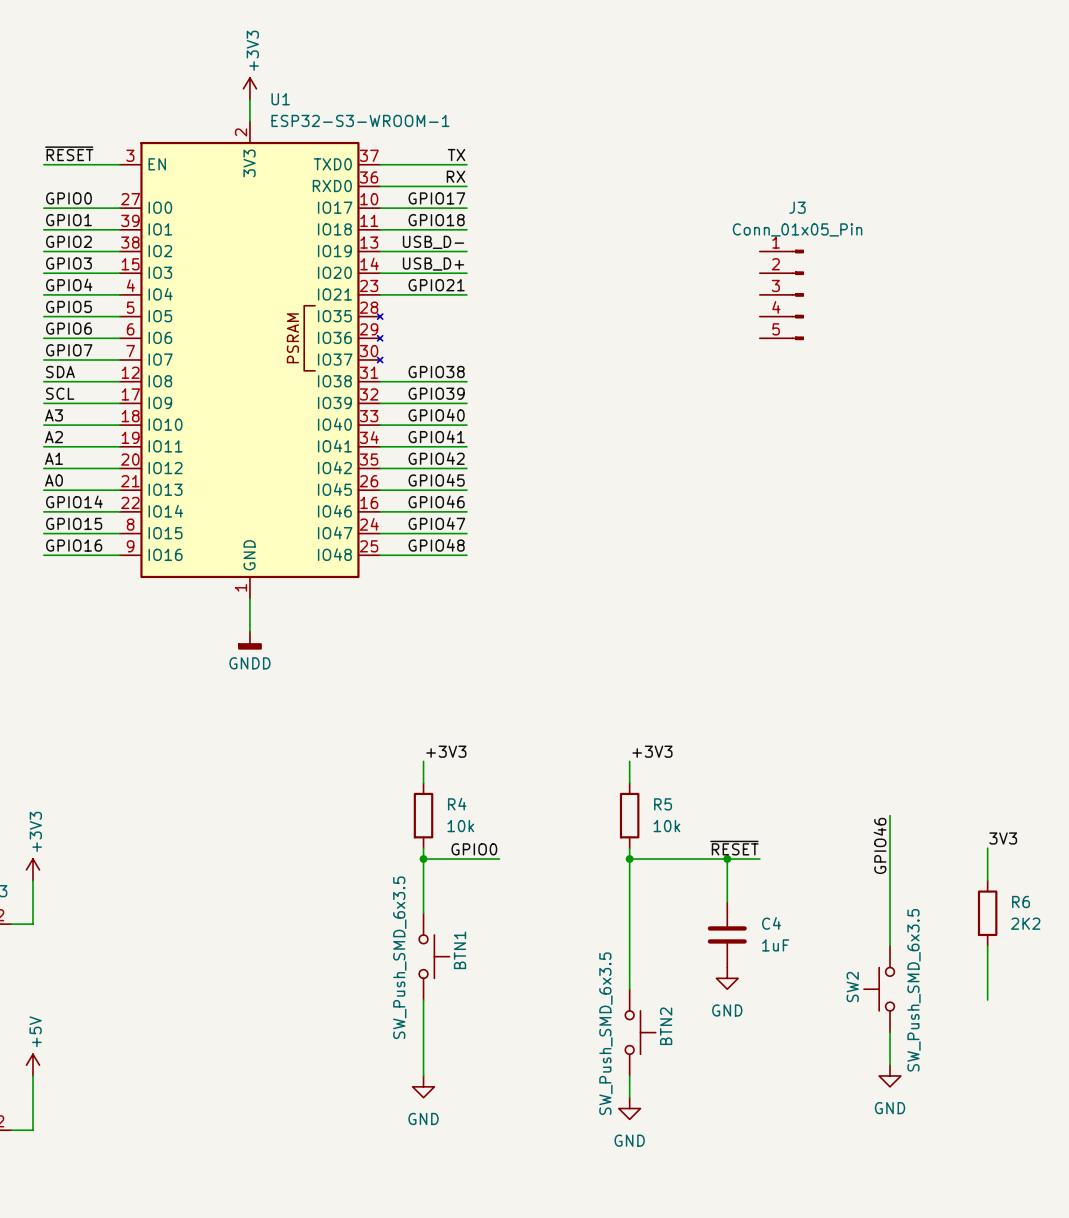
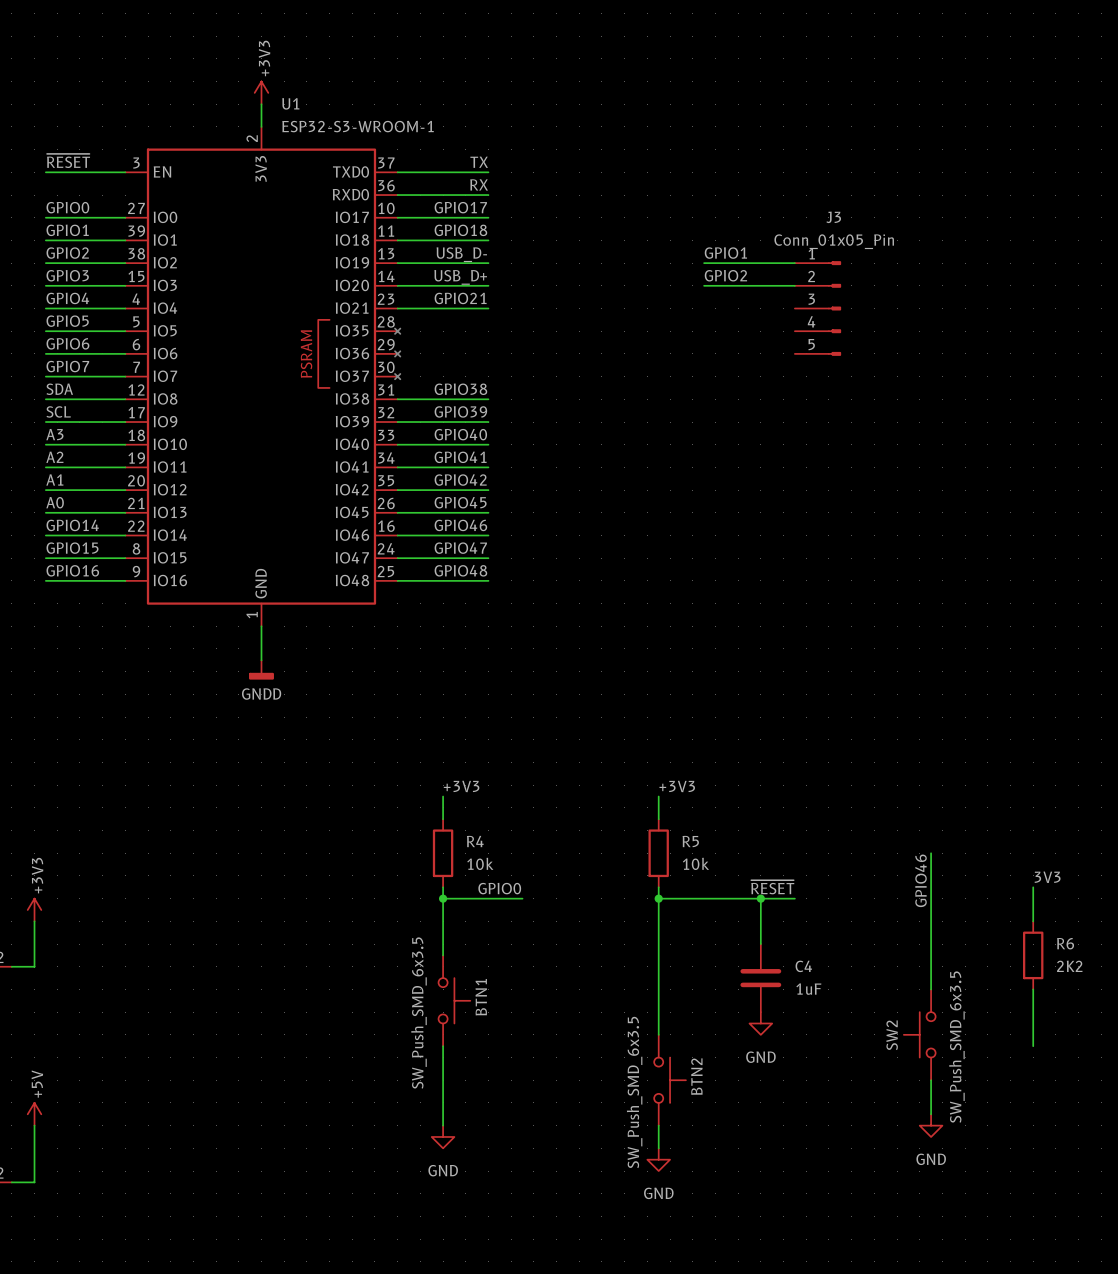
label: none -> GPIO1 (725, 253)
wire: none -> (704, 263) (794, 263)
label: none -> GPIO2 (725, 275)
wire: none -> (704, 285) (794, 285)

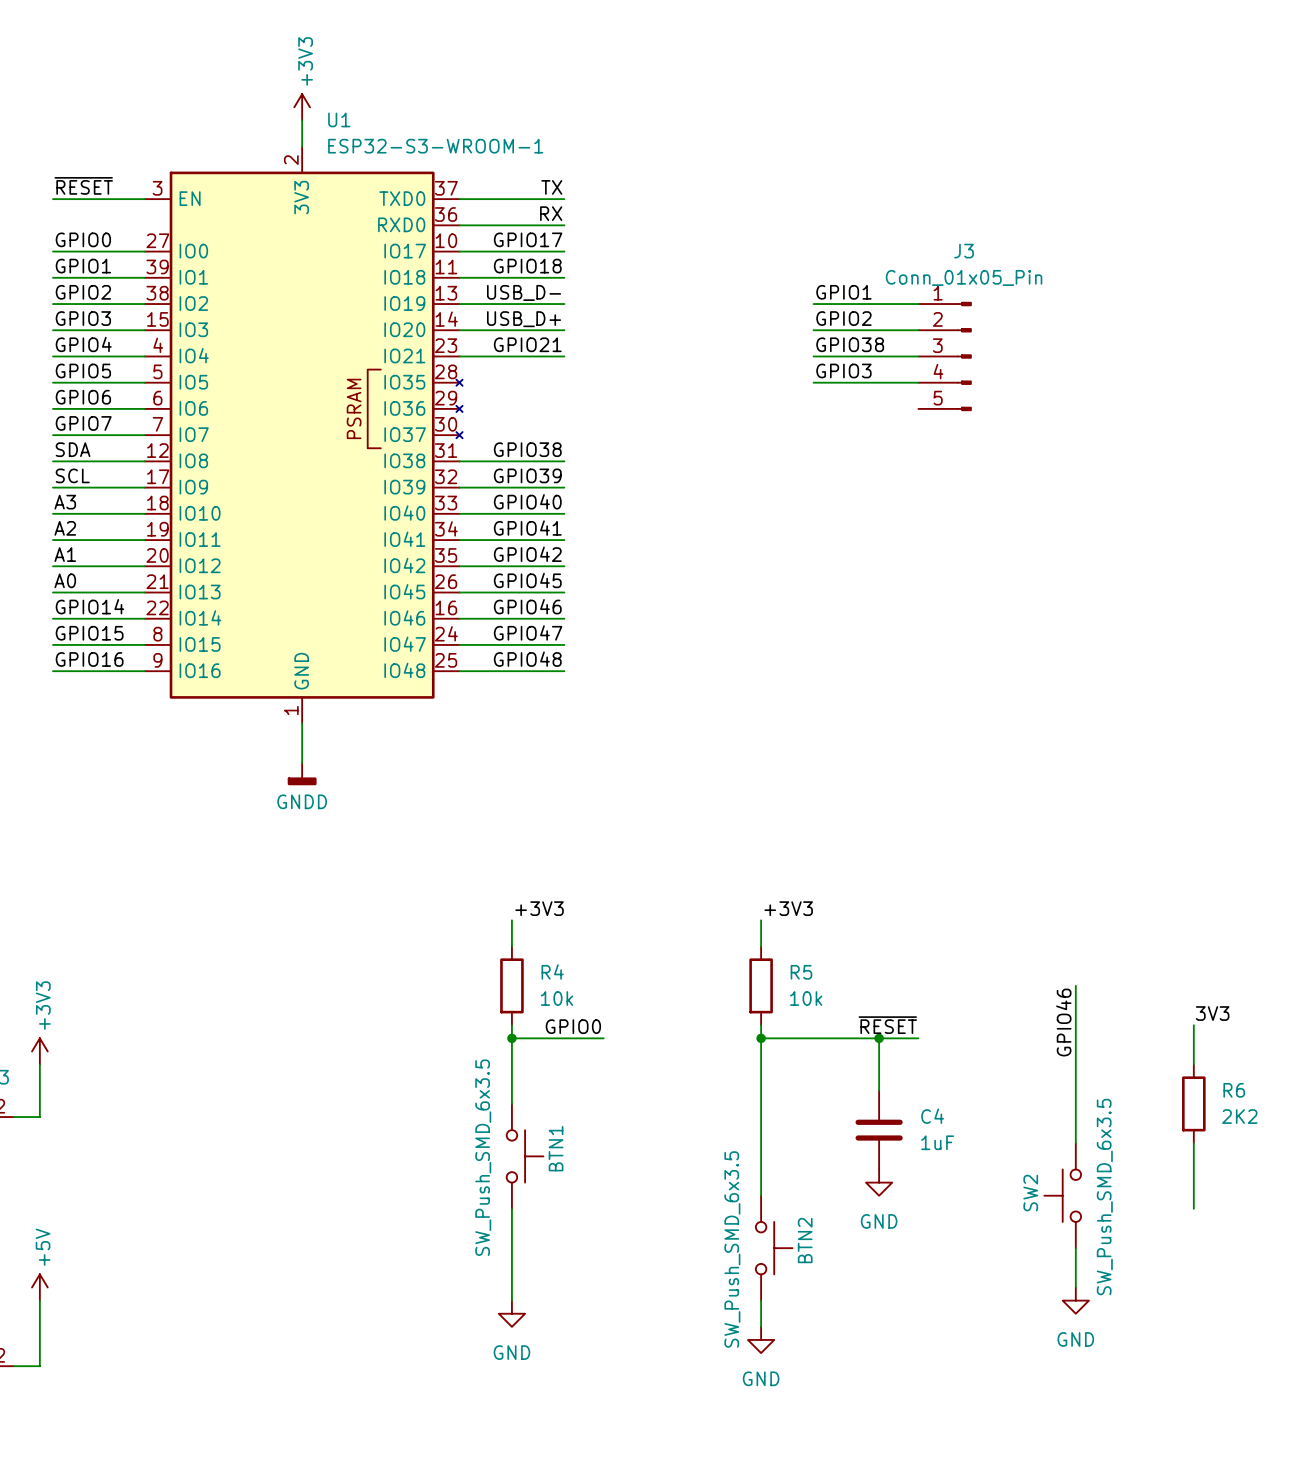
label: none -> GPIO38 (850, 344)
wire: none -> (813, 356) (918, 356)
label: none -> GPIO3 (843, 371)
wire: none -> (813, 382) (918, 382)

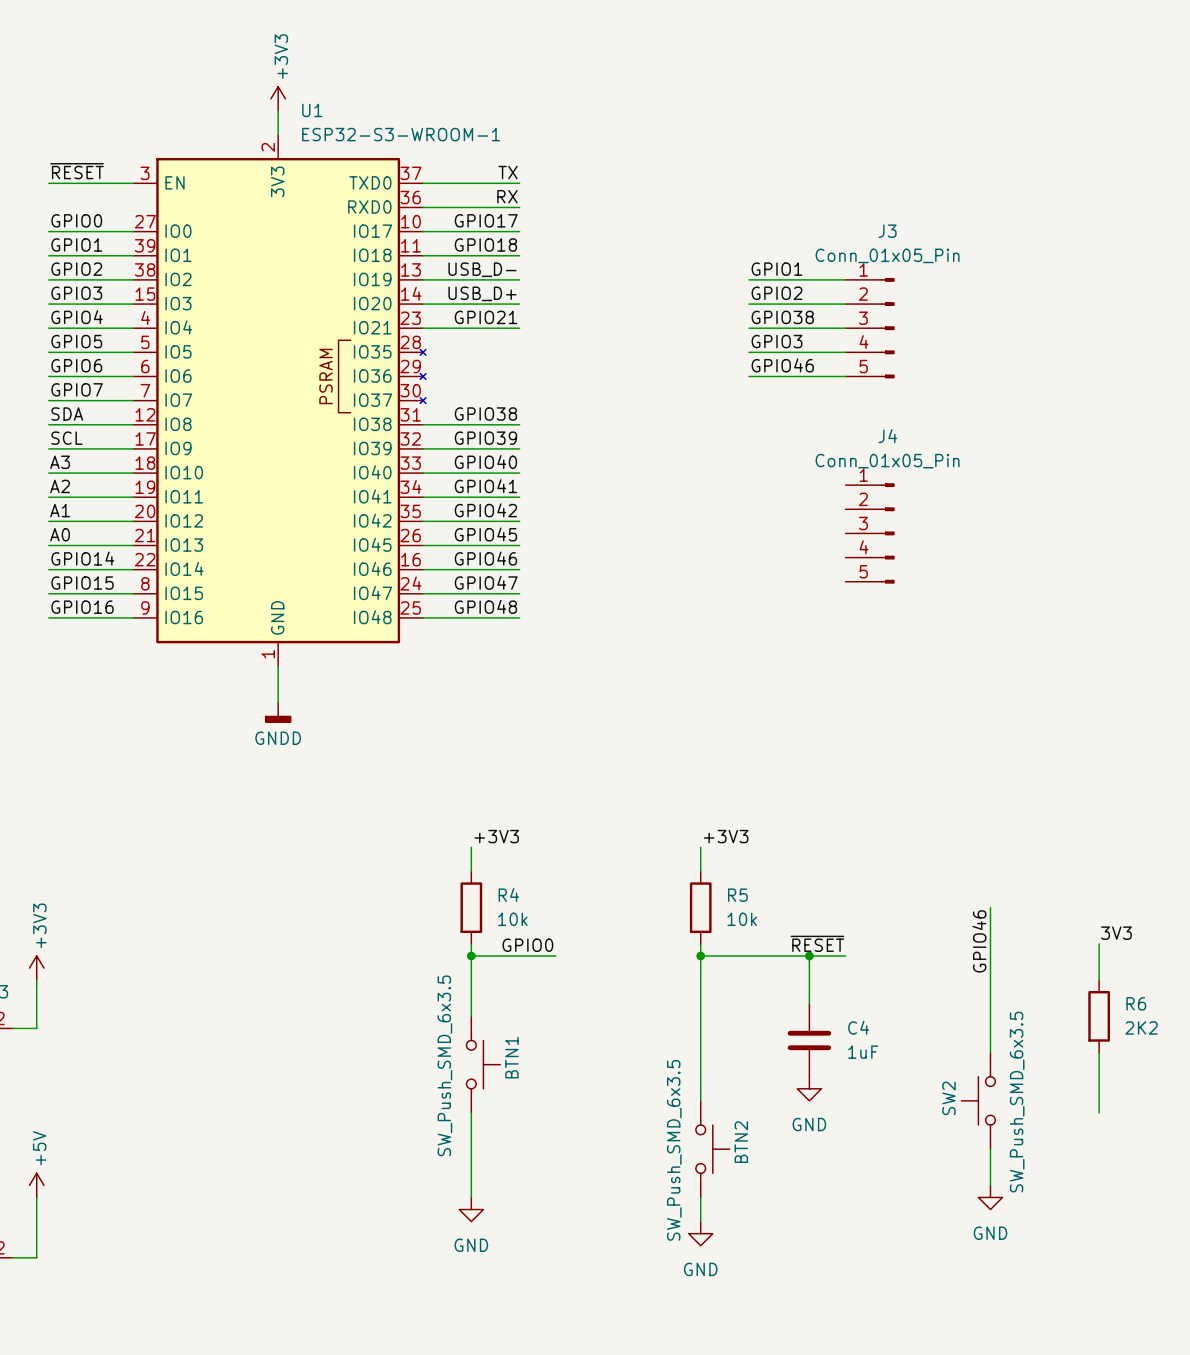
label: none -> GPIO46 (782, 365)
wire: none -> (749, 376) (845, 376)
J4: none -> Conn_01x05_Pin (870, 533)

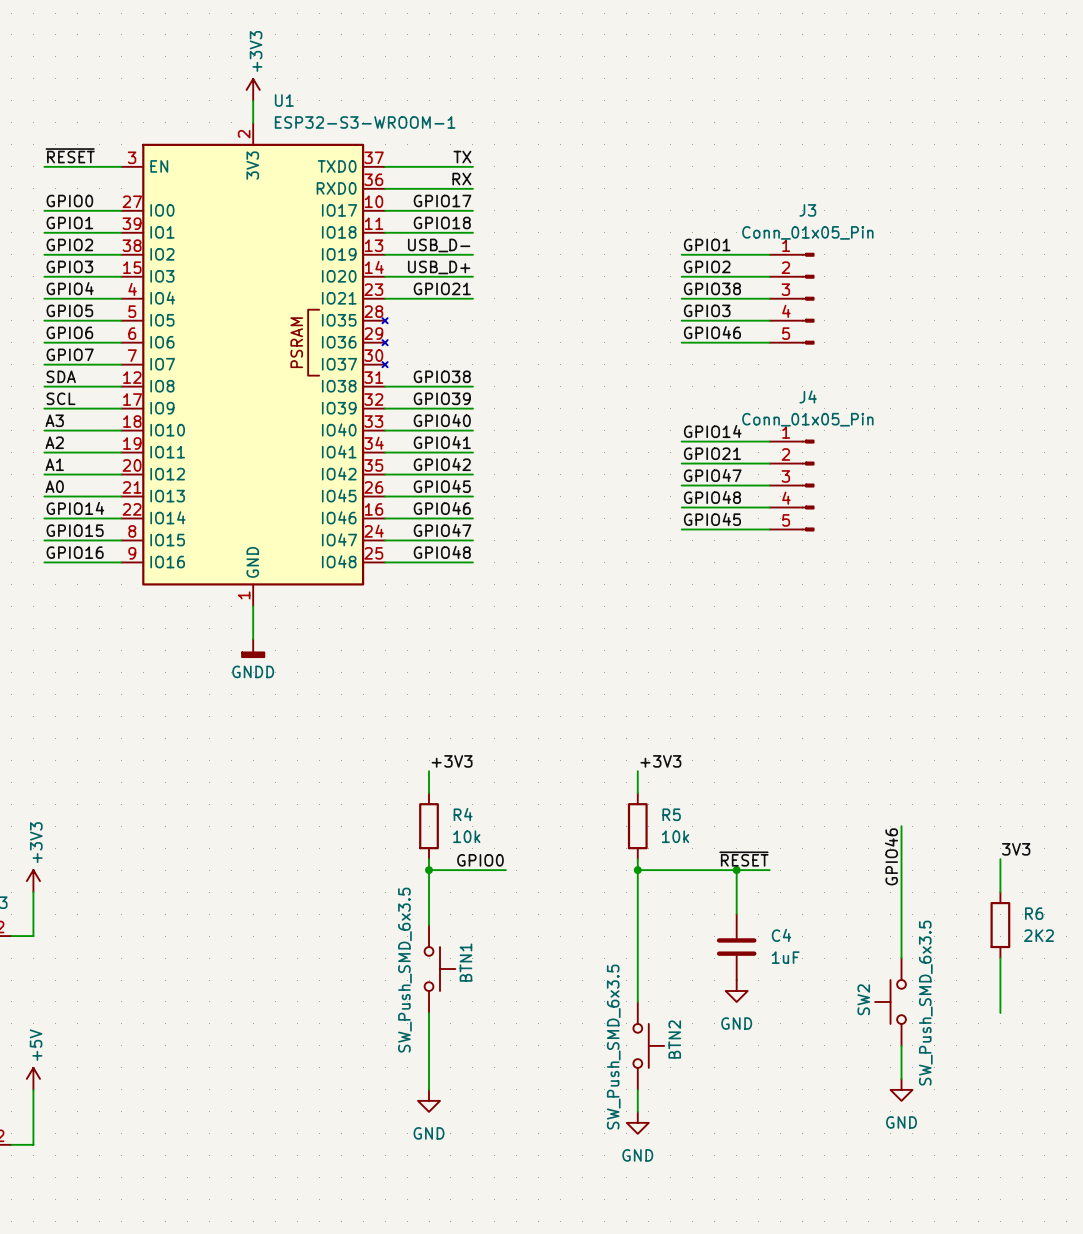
label: none -> GPIO14 (712, 431)
wire: none -> (681, 441) (769, 441)
label: none -> GPIO21 (712, 453)
wire: none -> (681, 463) (769, 463)
label: none -> GPIO47 (712, 475)
wire: none -> (681, 485) (769, 485)
label: none -> GPIO48 (712, 497)
wire: none -> (681, 507) (769, 507)
label: none -> GPIO45 (712, 519)
wire: none -> (681, 529) (769, 529)

